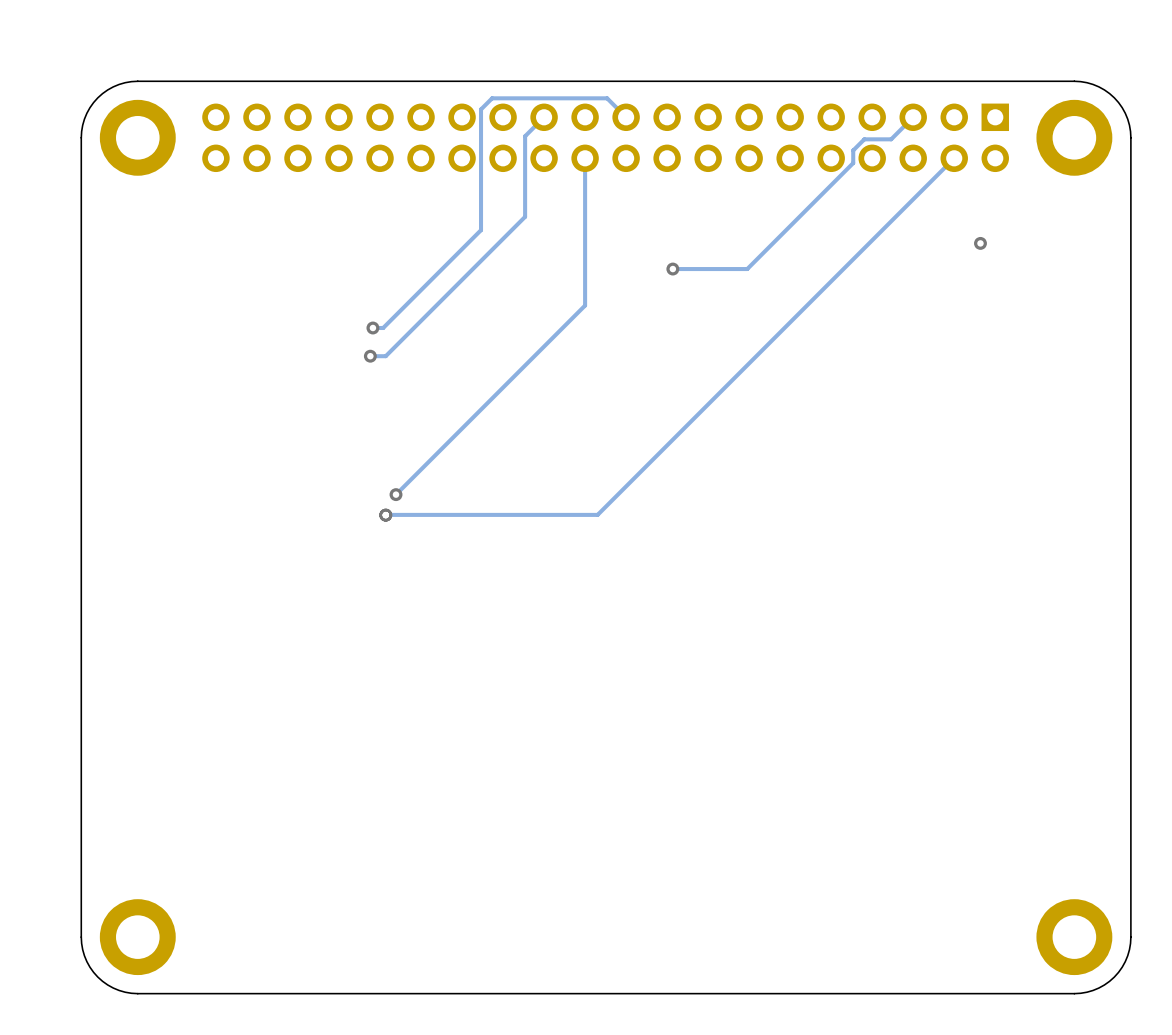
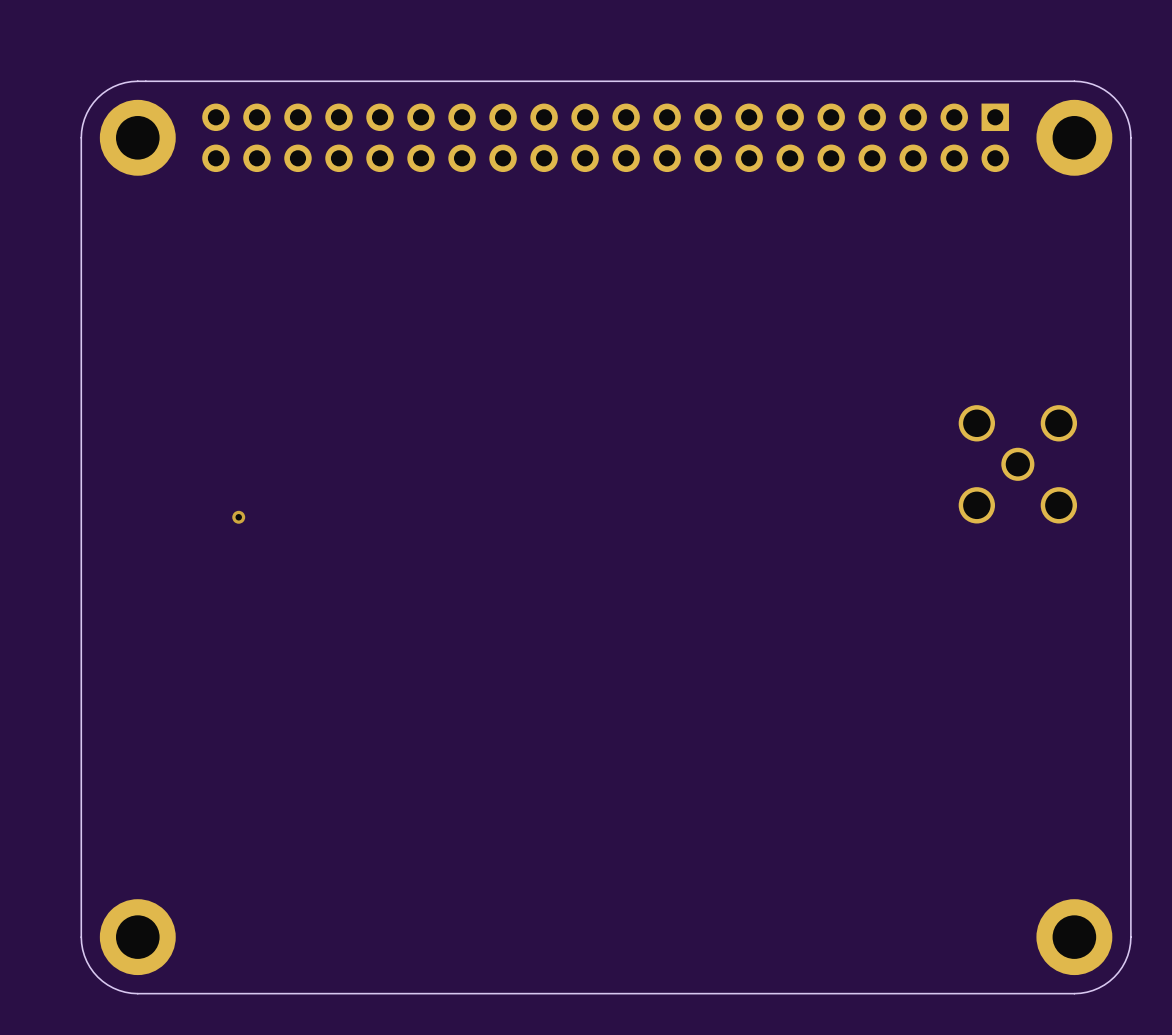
track: (544, 117) (525, 136) (525, 216) (385, 356) (370, 356) -> none
track: (626, 117) (607, 98) (492, 98) (481, 109) (481, 230) (383, 328) (372, 328) (370, 330) -> none
track: (913, 117) (891, 139) (864, 139) (853, 150) (853, 163) (747, 269) (672, 269) -> none
track: (585, 158) (585, 305) (396, 494) -> none
track: (954, 158) (597, 514) (385, 515) -> none
via: (980, 243) -> none
via: (672, 269) -> none
via: (372, 328) -> none
via: (370, 356) -> none
part: none -> (1017, 464)
via: (396, 494) -> none
via: (385, 515) -> none
via: none -> (238, 517)

